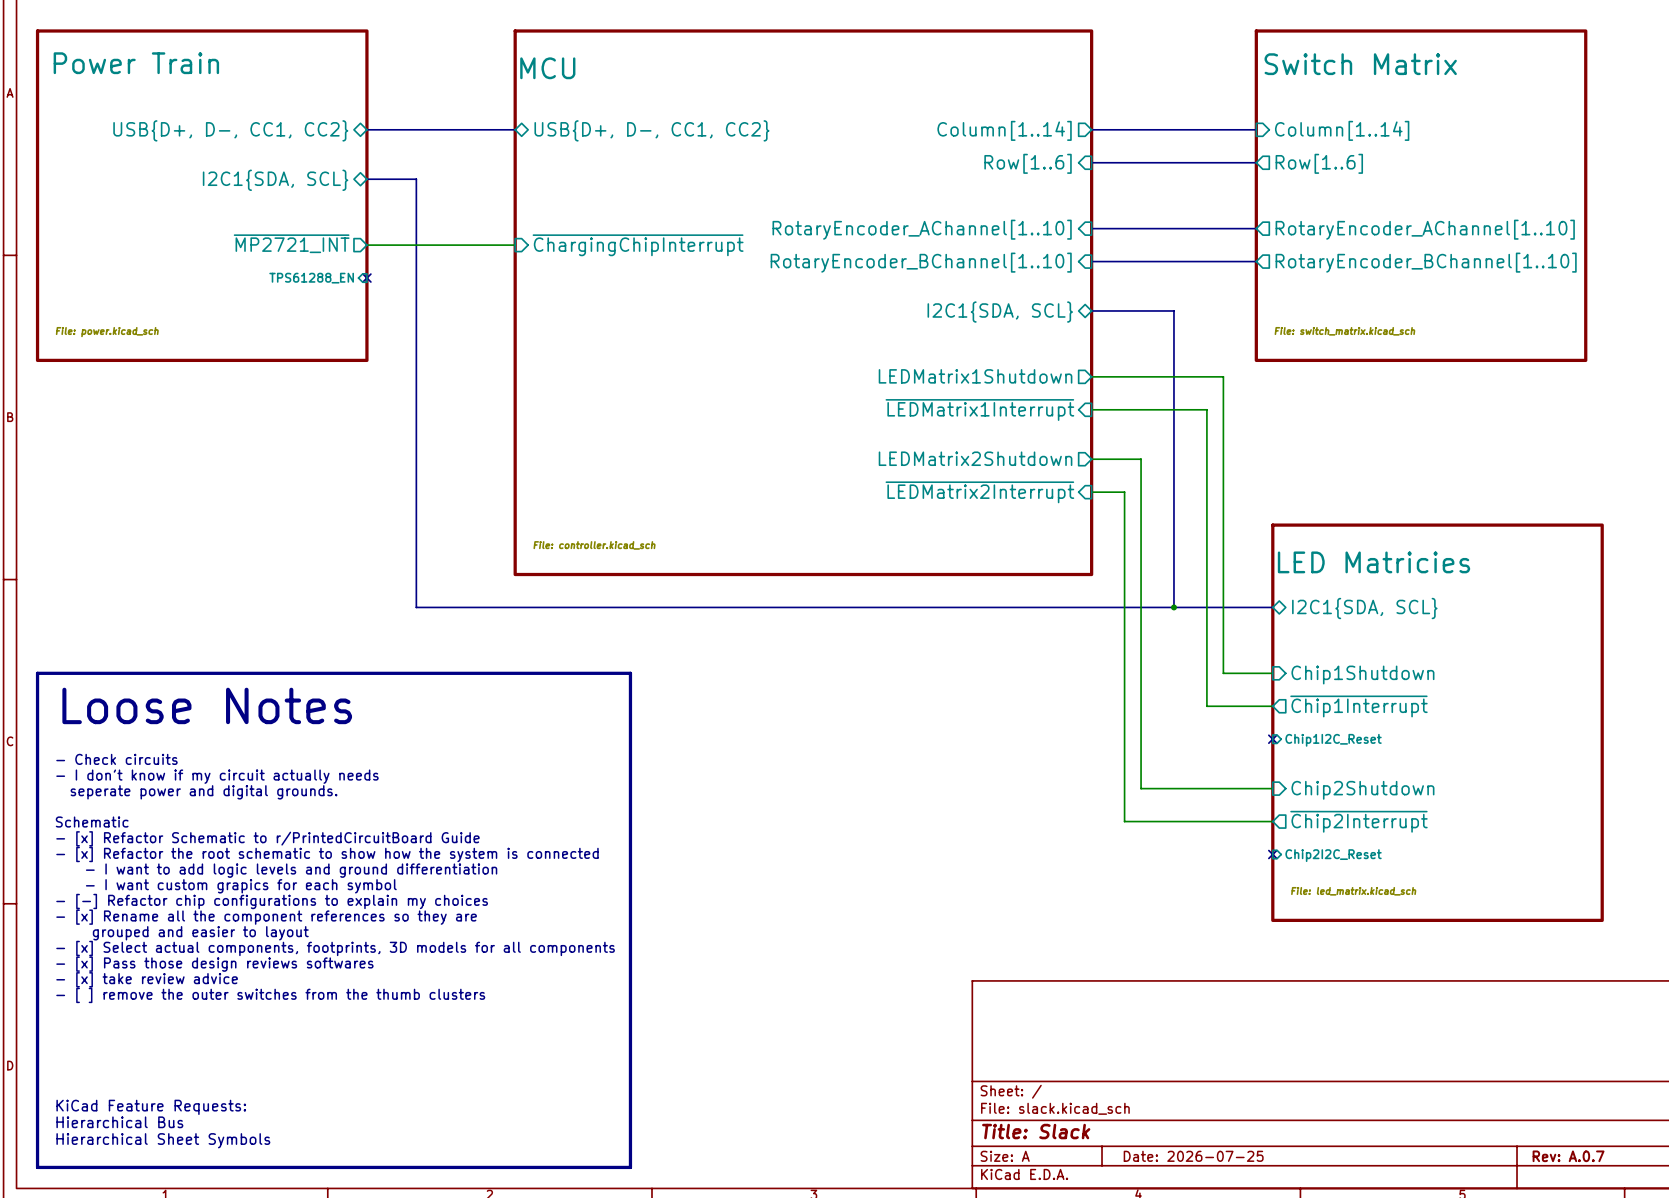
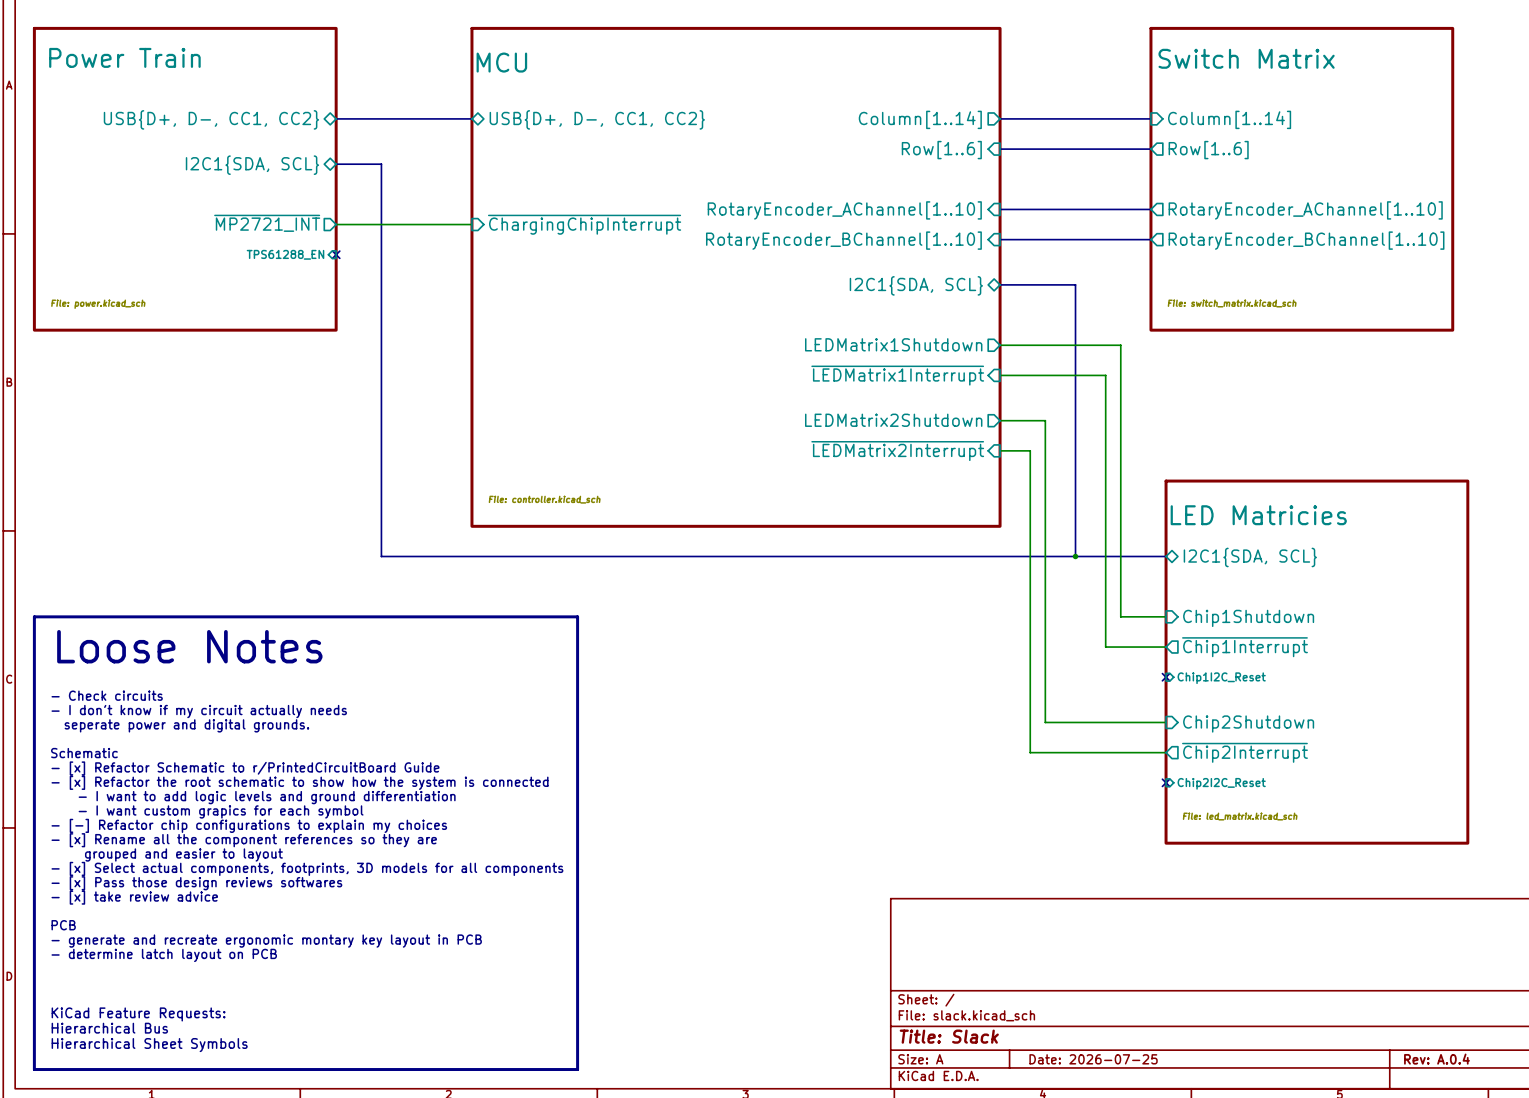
text: - [ ] remove the outer switches from the thumb clusters (270, 995) -> none
text: none -> PCB (63, 925)
text: none -> - generate and recreate ergonomic montary key layout in PCB (266, 941)
text: none -> - determine latch layout on PCB (164, 955)
title block: Rev: A.0.7 (1568, 1156) -> Rev: A.0.4 (1436, 1059)

